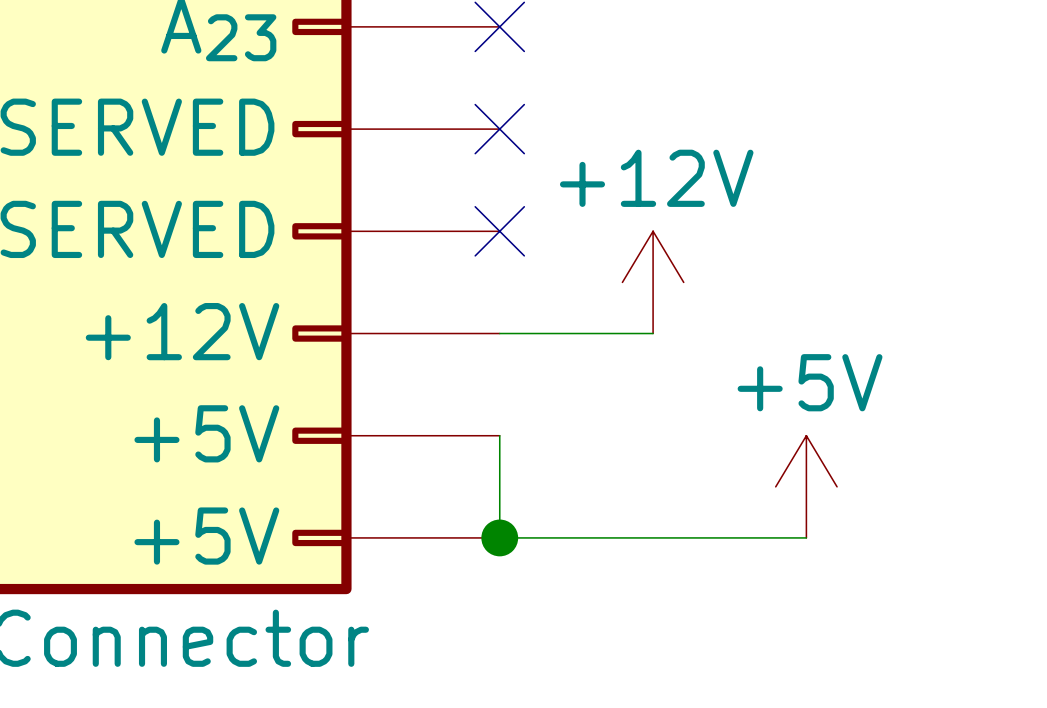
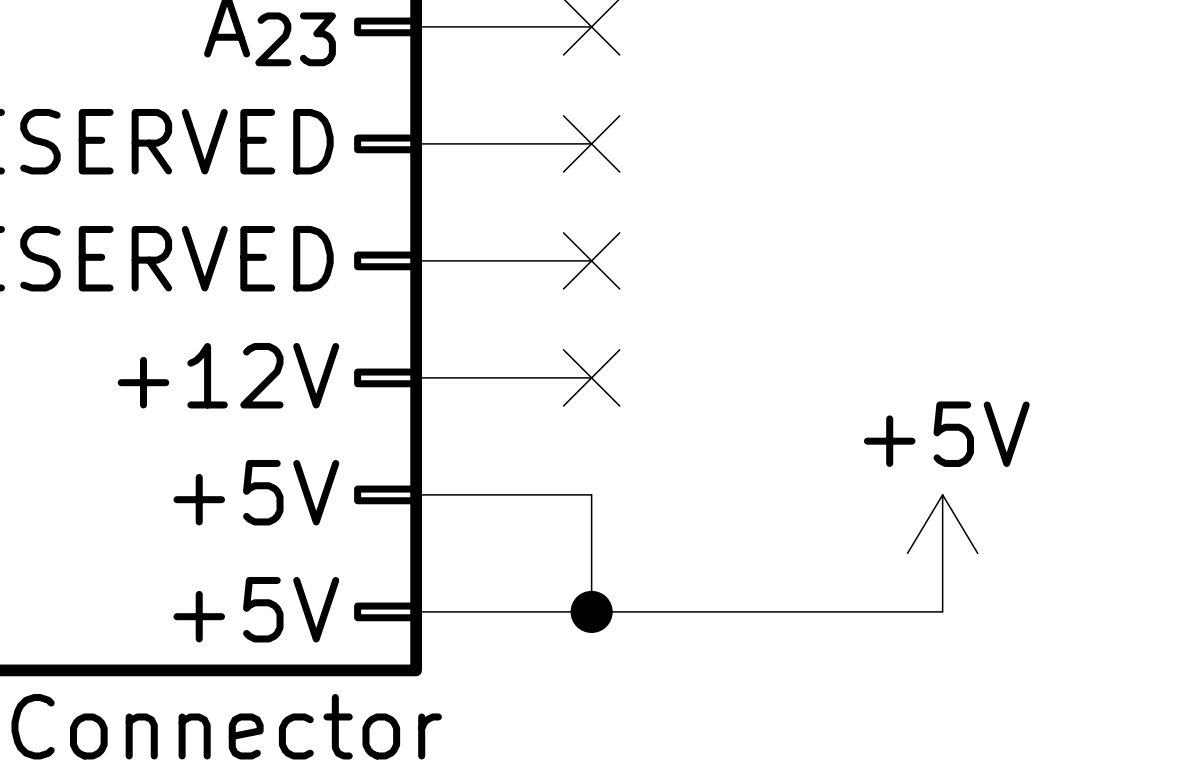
power symbol: +12V (653, 282) -> none
wire: (499, 333) (653, 333) -> none
no-connect mark: none -> (591, 377)

